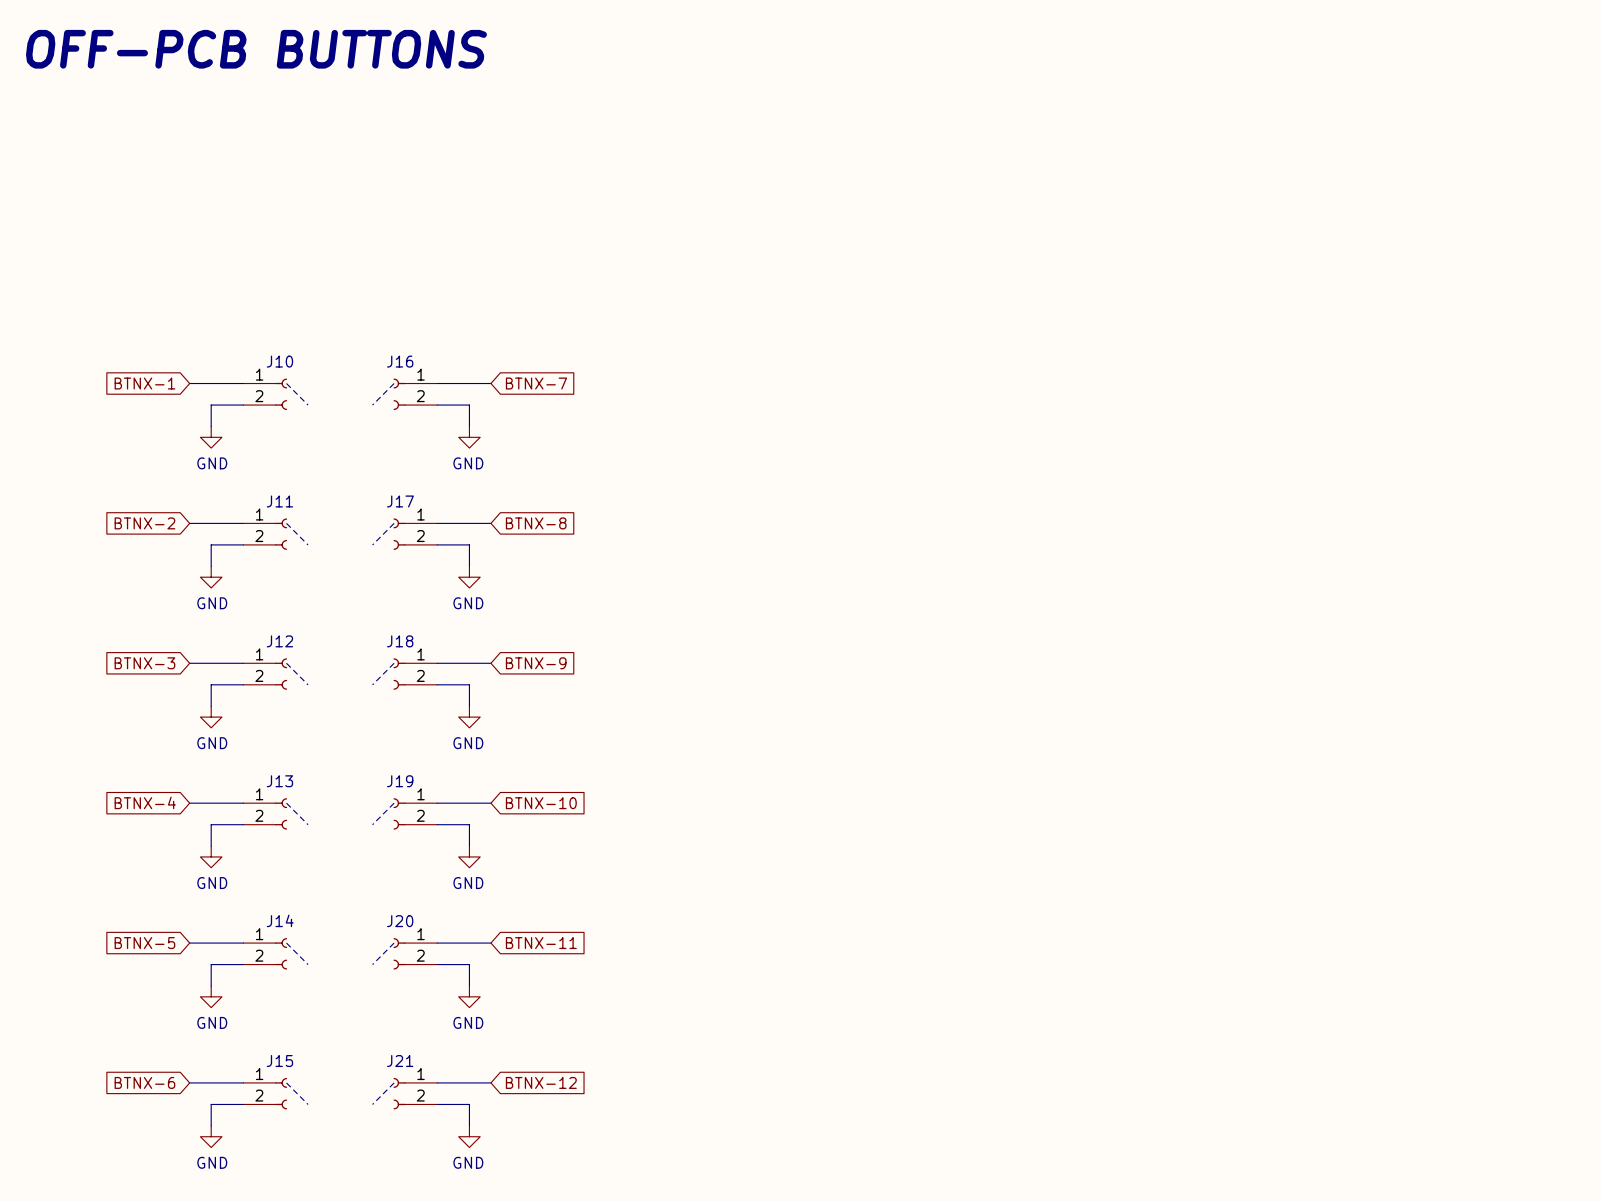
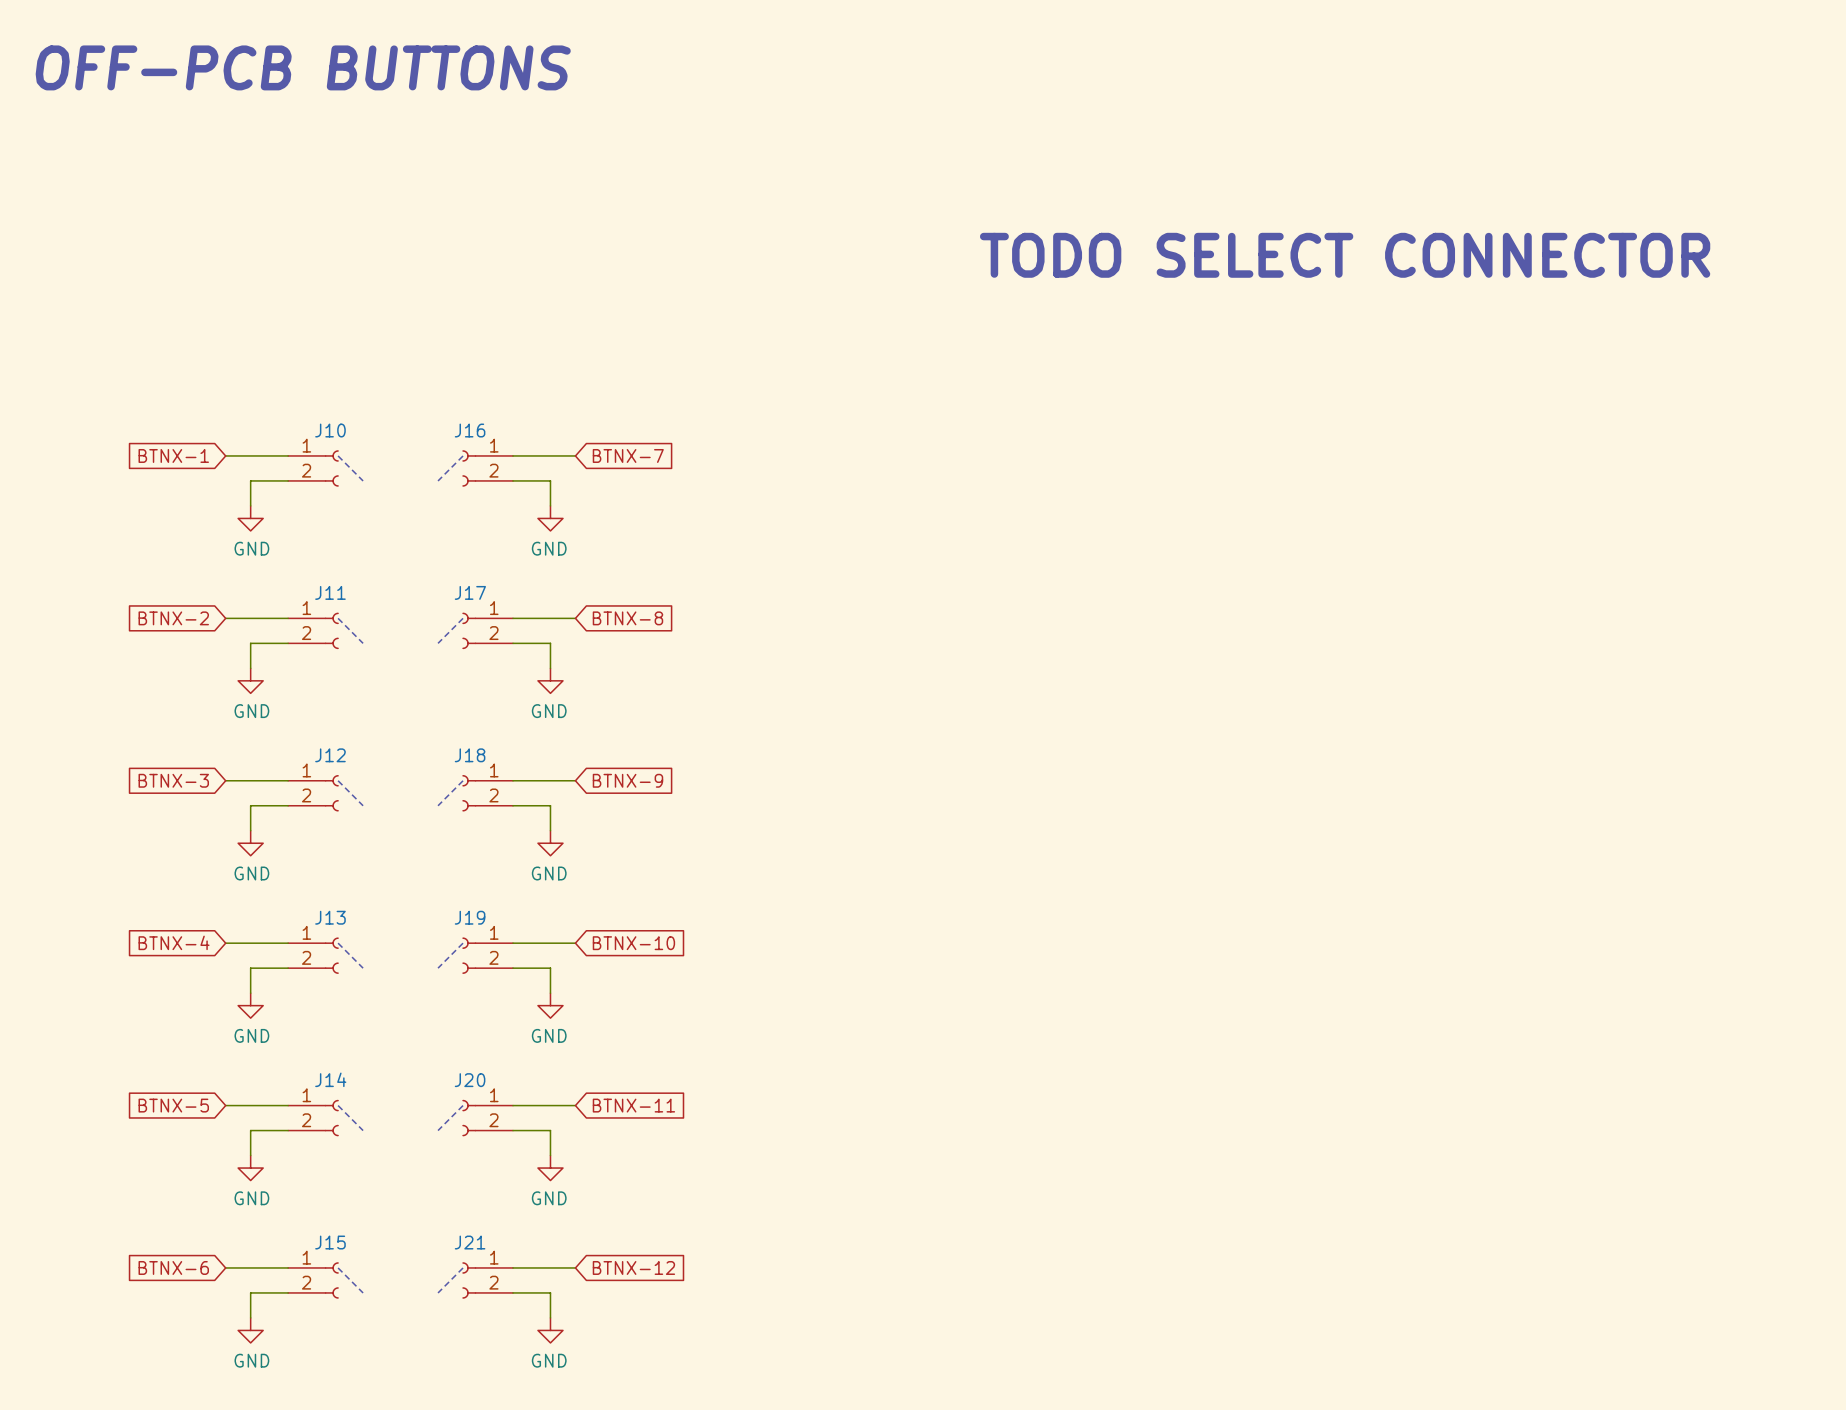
text: none -> TODO SELECT CONNECTOR (1345, 255)

